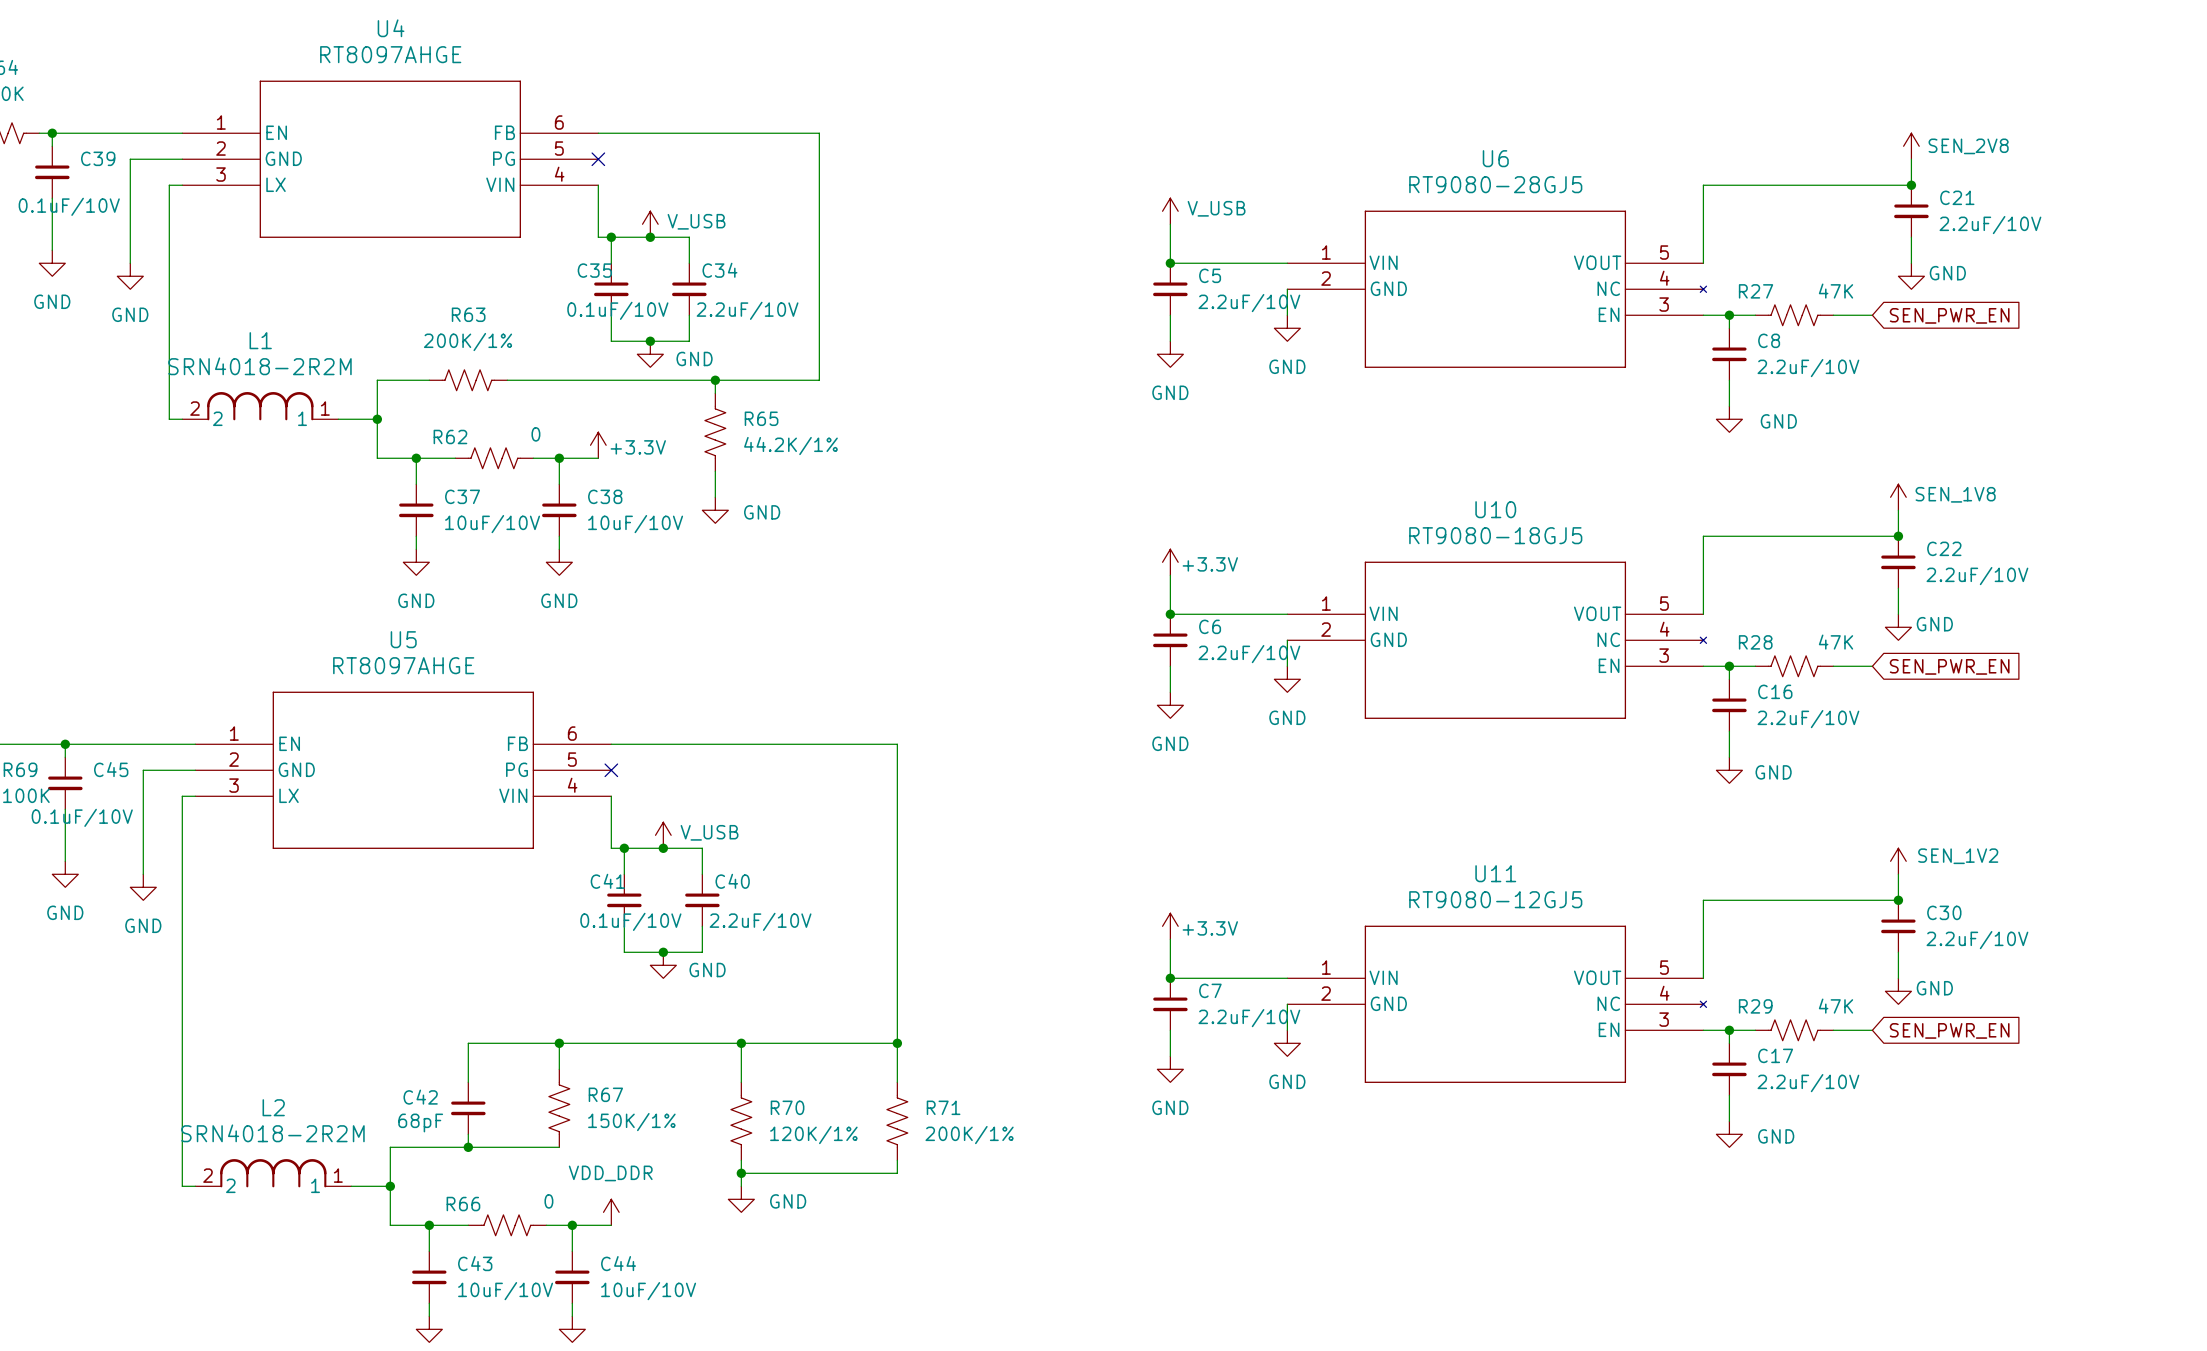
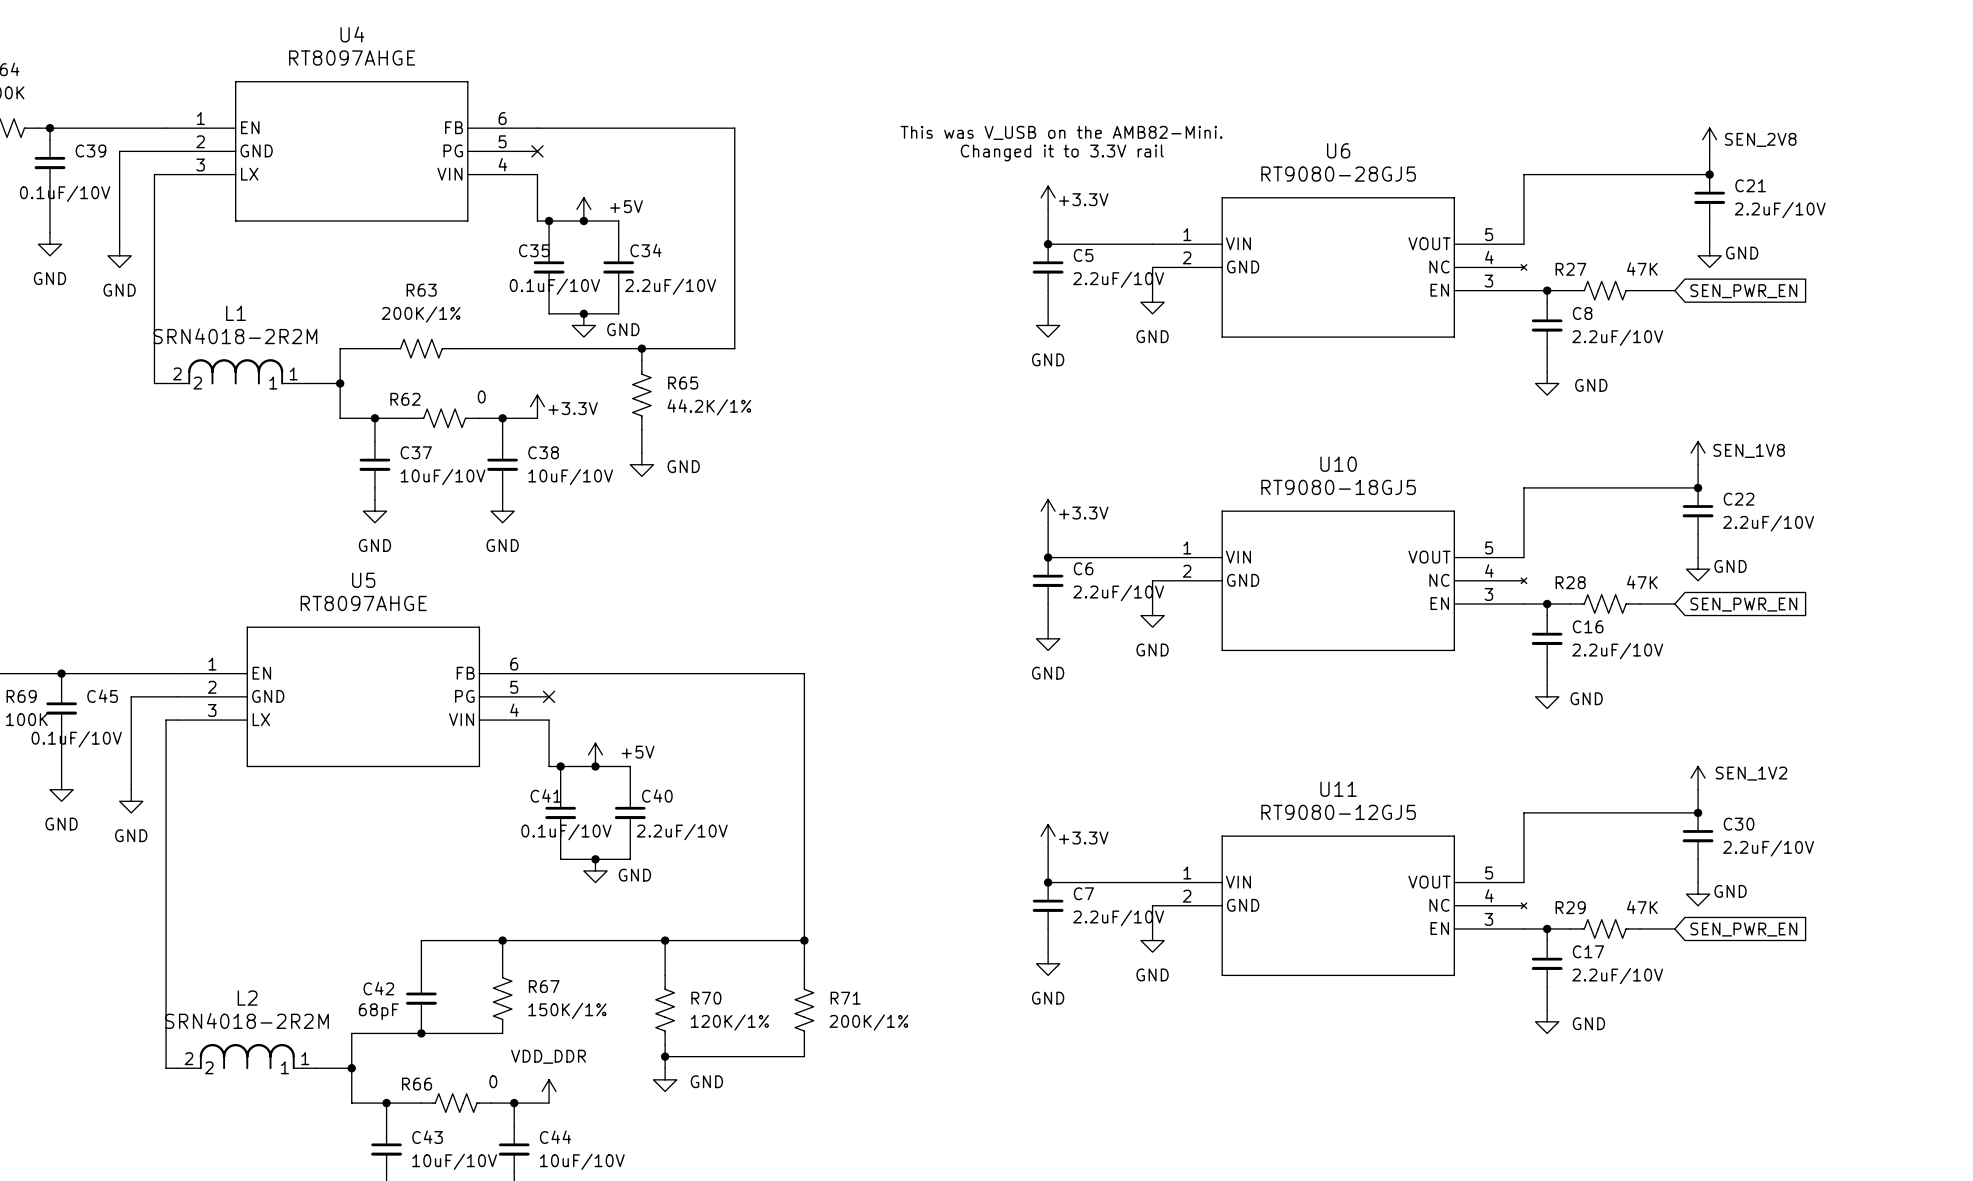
text: none -> This was V_USB on the AMB82-Mini. (1061, 132)
text: none -> Changed it to 3.3V rail (1062, 152)
power symbol: V_USB (1170, 211) -> +3.3V (1048, 197)
power symbol: V_USB (650, 224) -> +5V (583, 209)
power symbol: V_USB (663, 835) -> +5V (595, 754)

